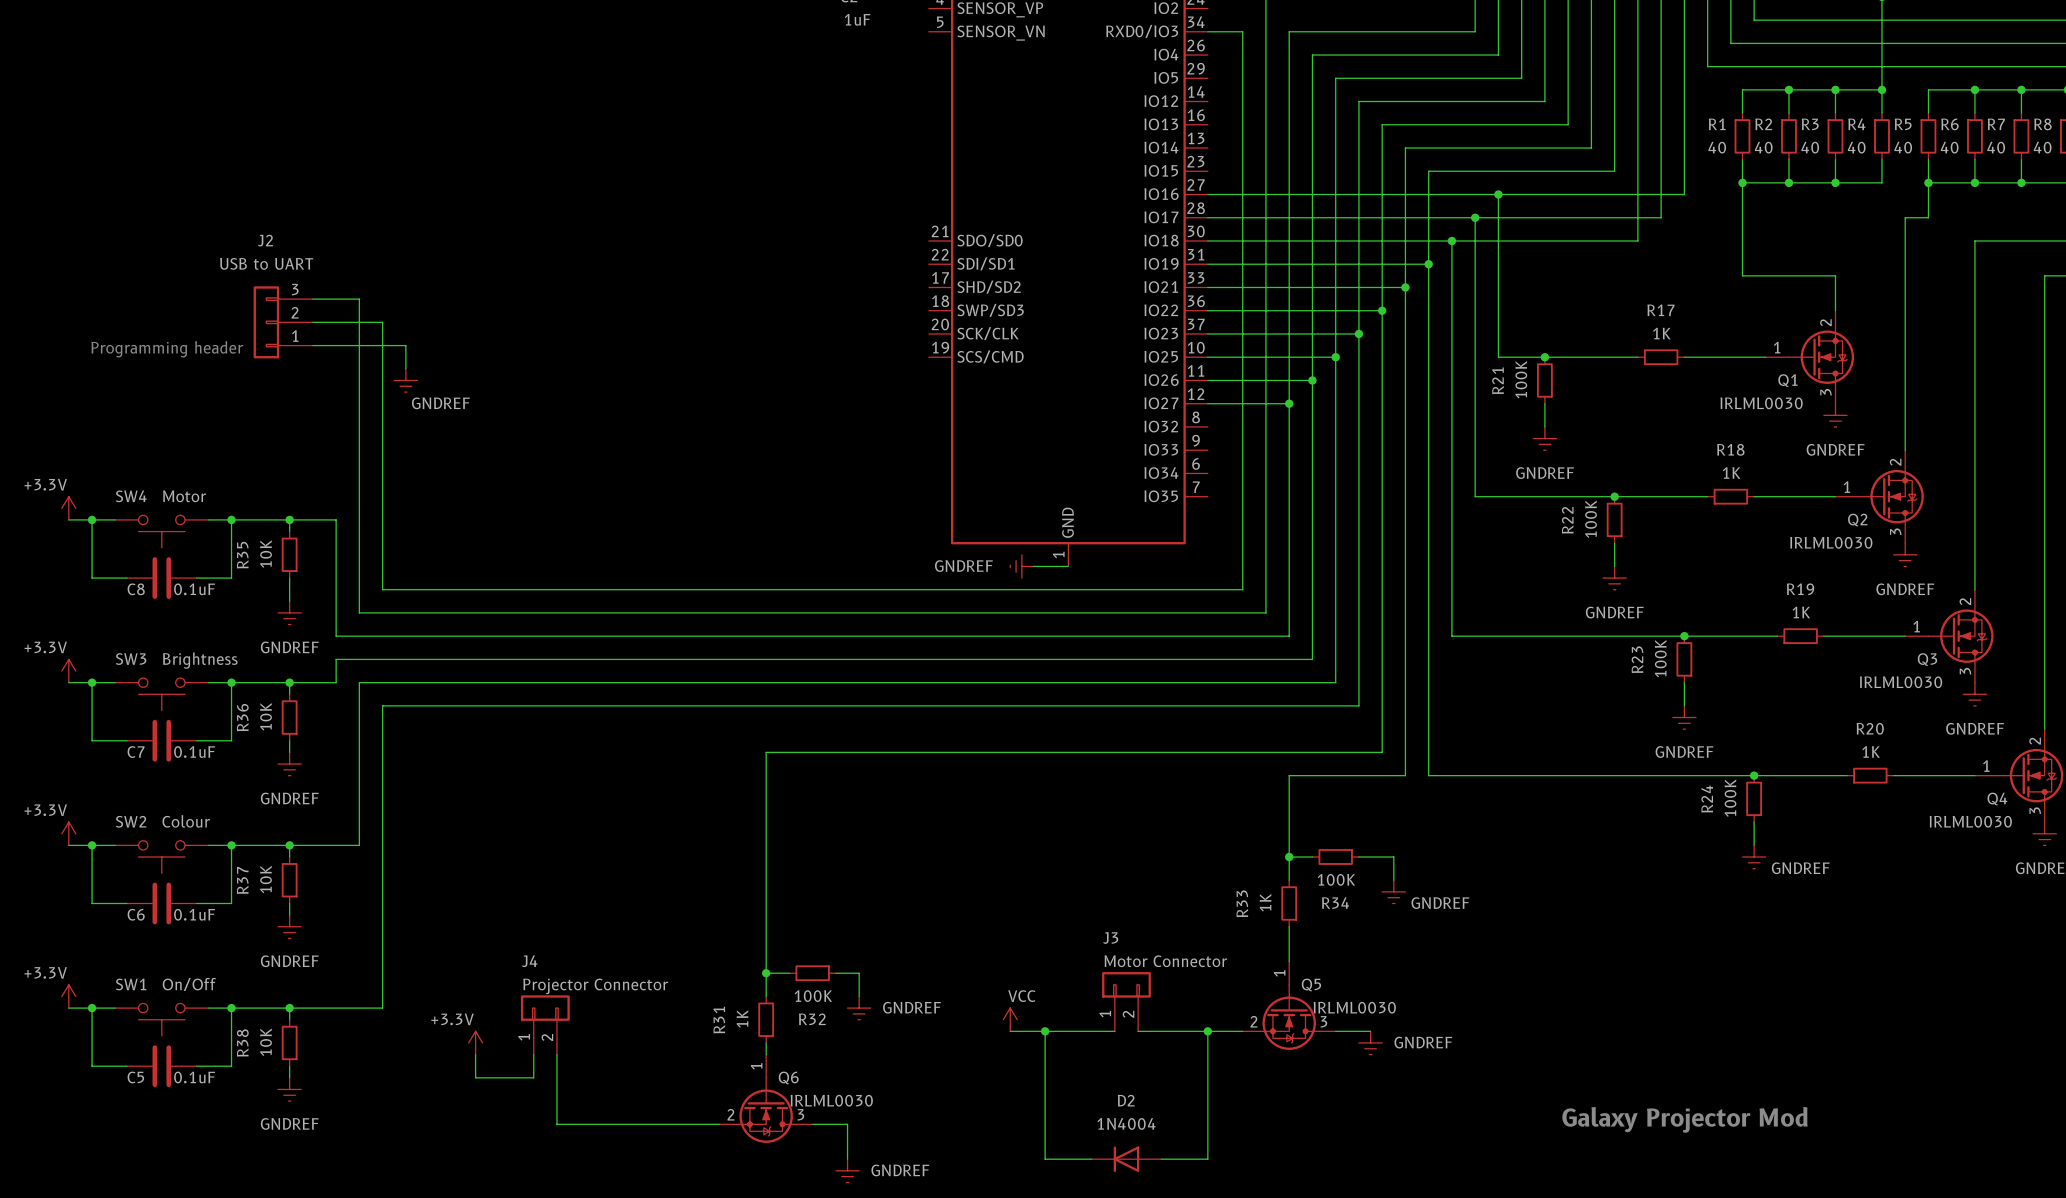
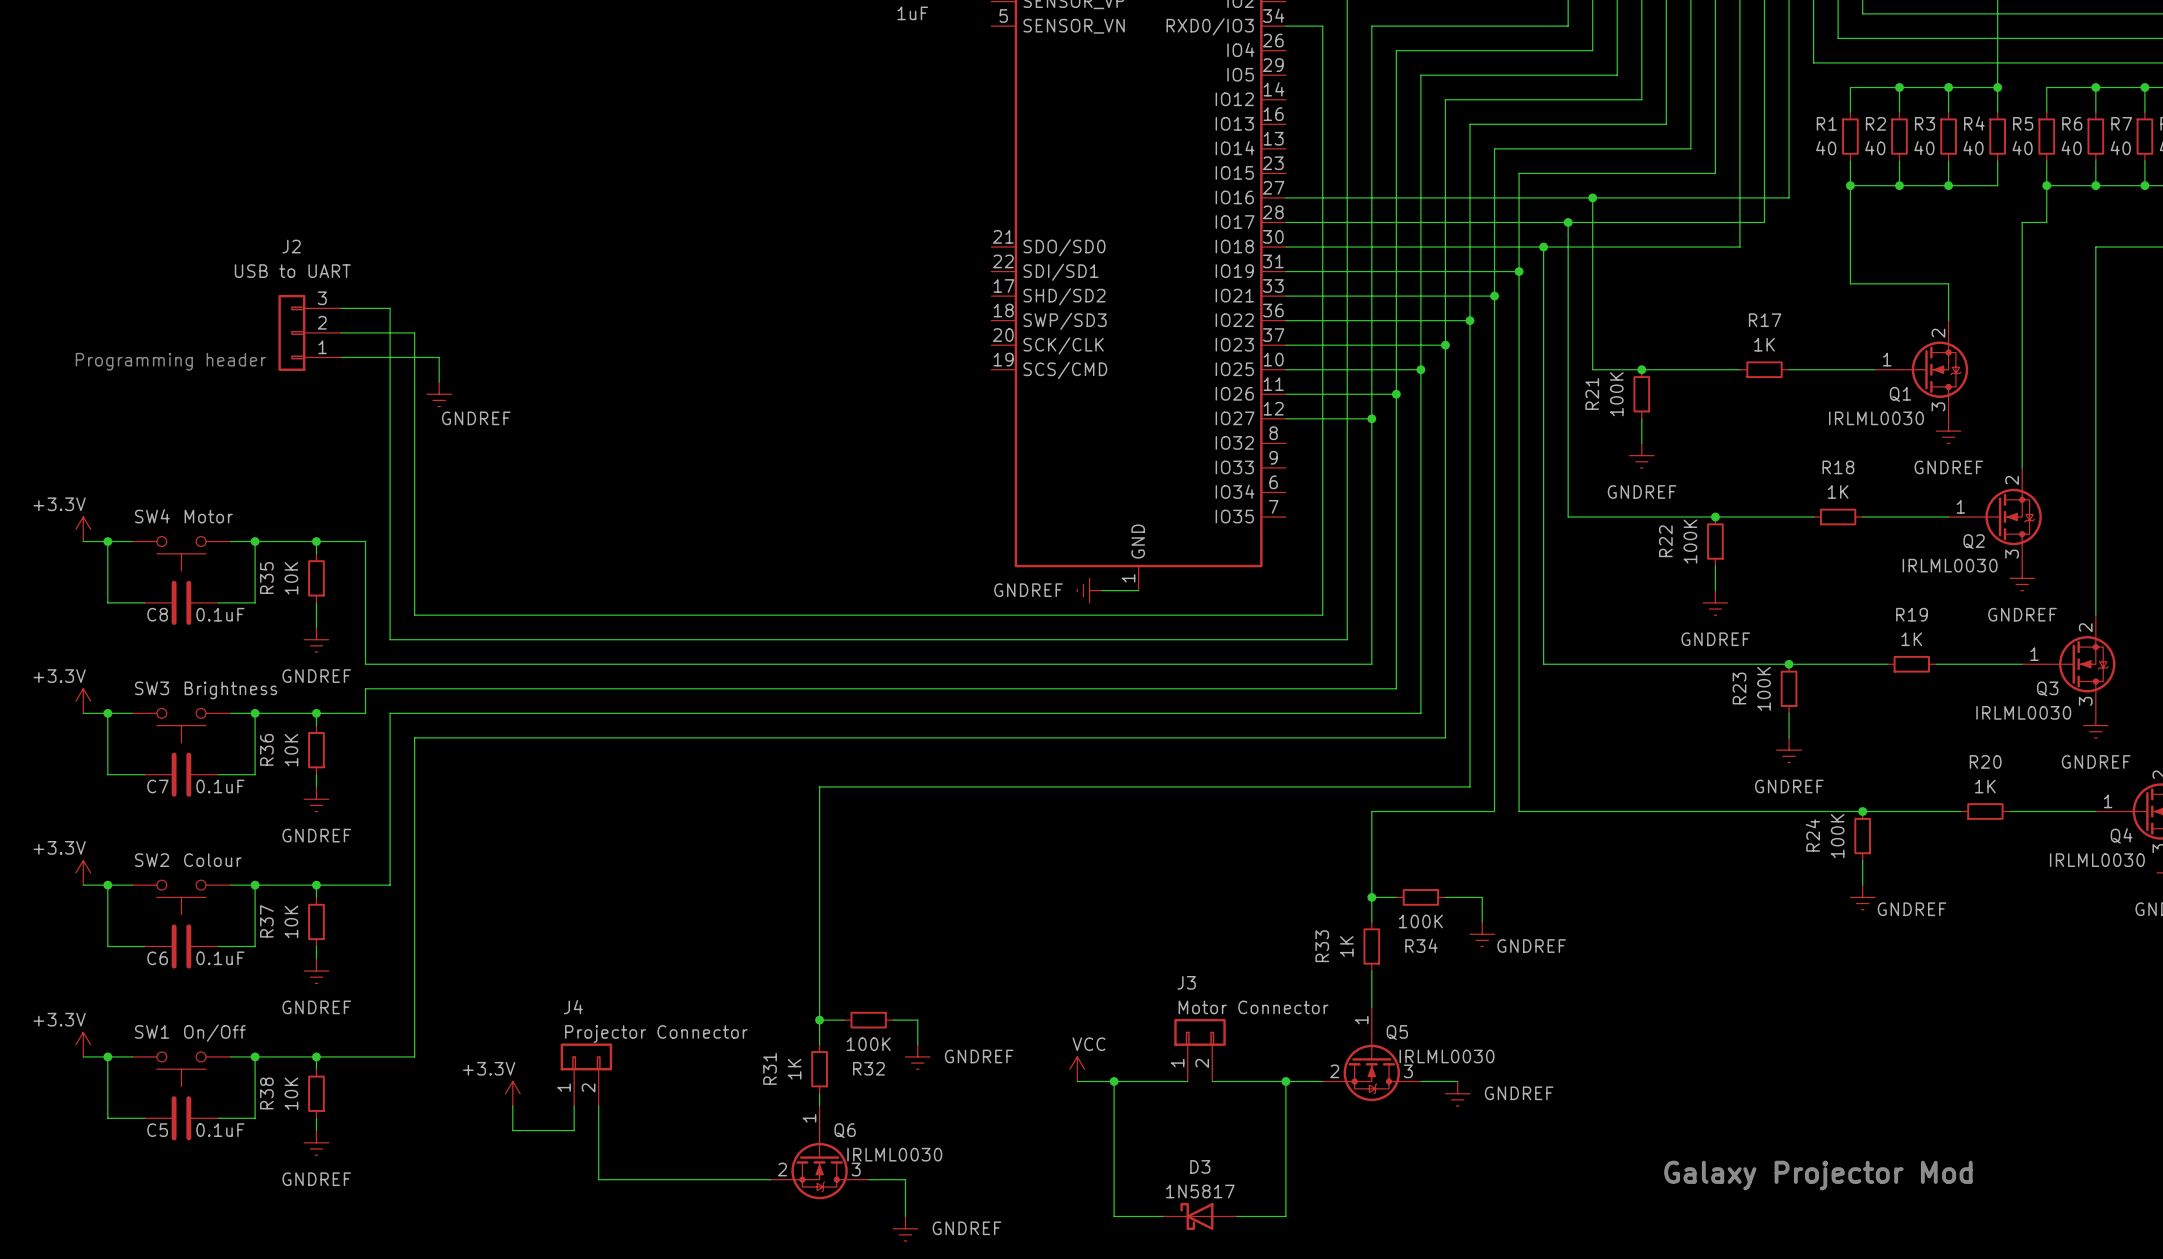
D2: 1N4004 (1126, 1159) -> none
D3: none -> 1N5817 (1200, 1216)

